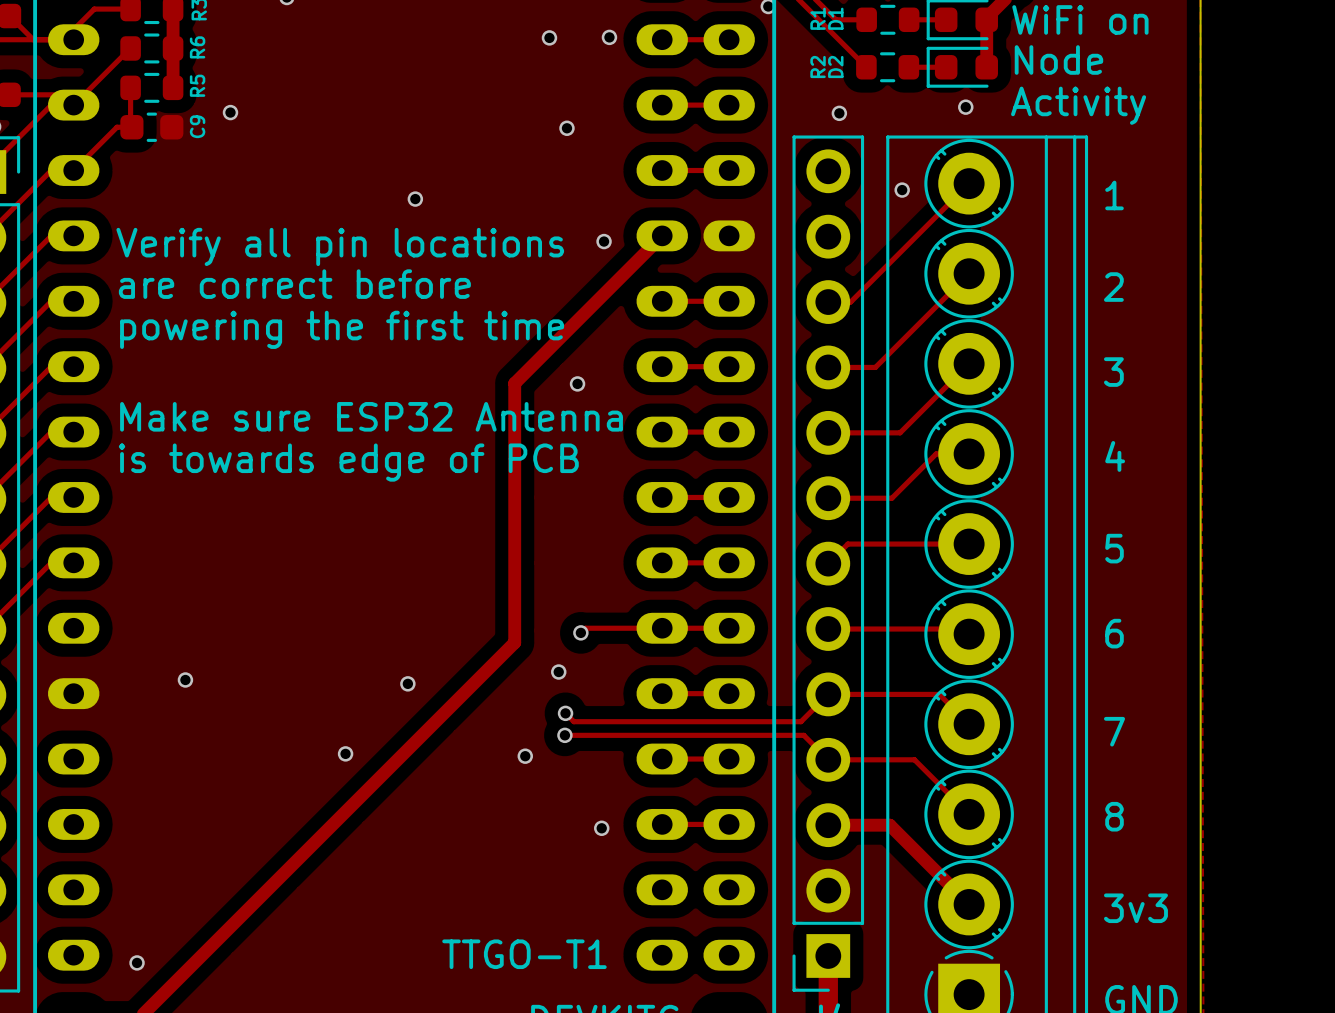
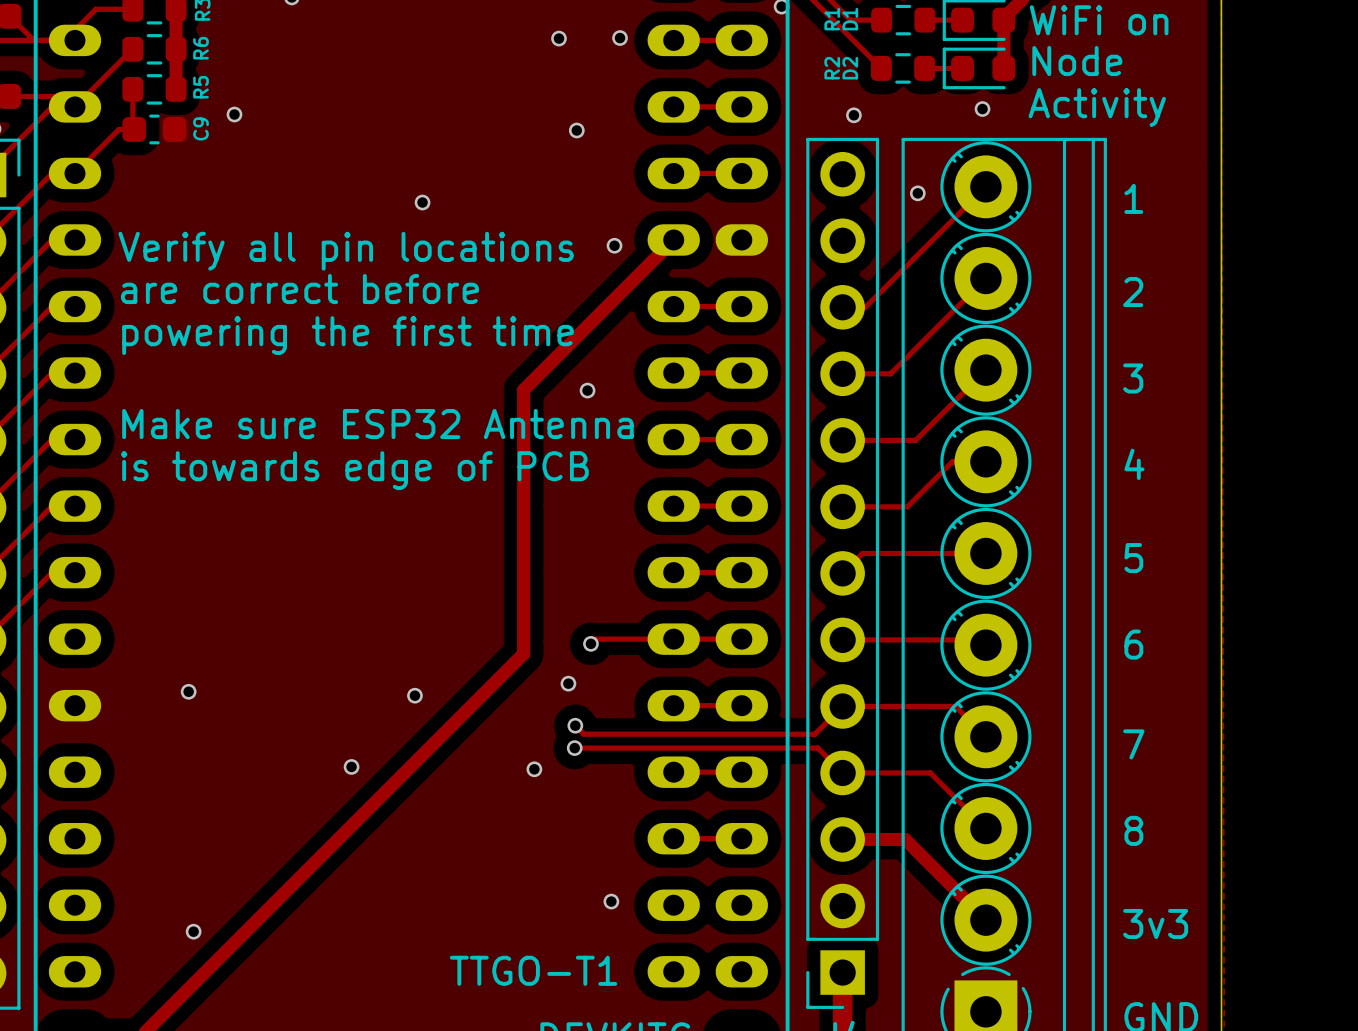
via position: (601, 828) -> (611, 901)
via: none -> (193, 931)
via: (137, 962) -> none

